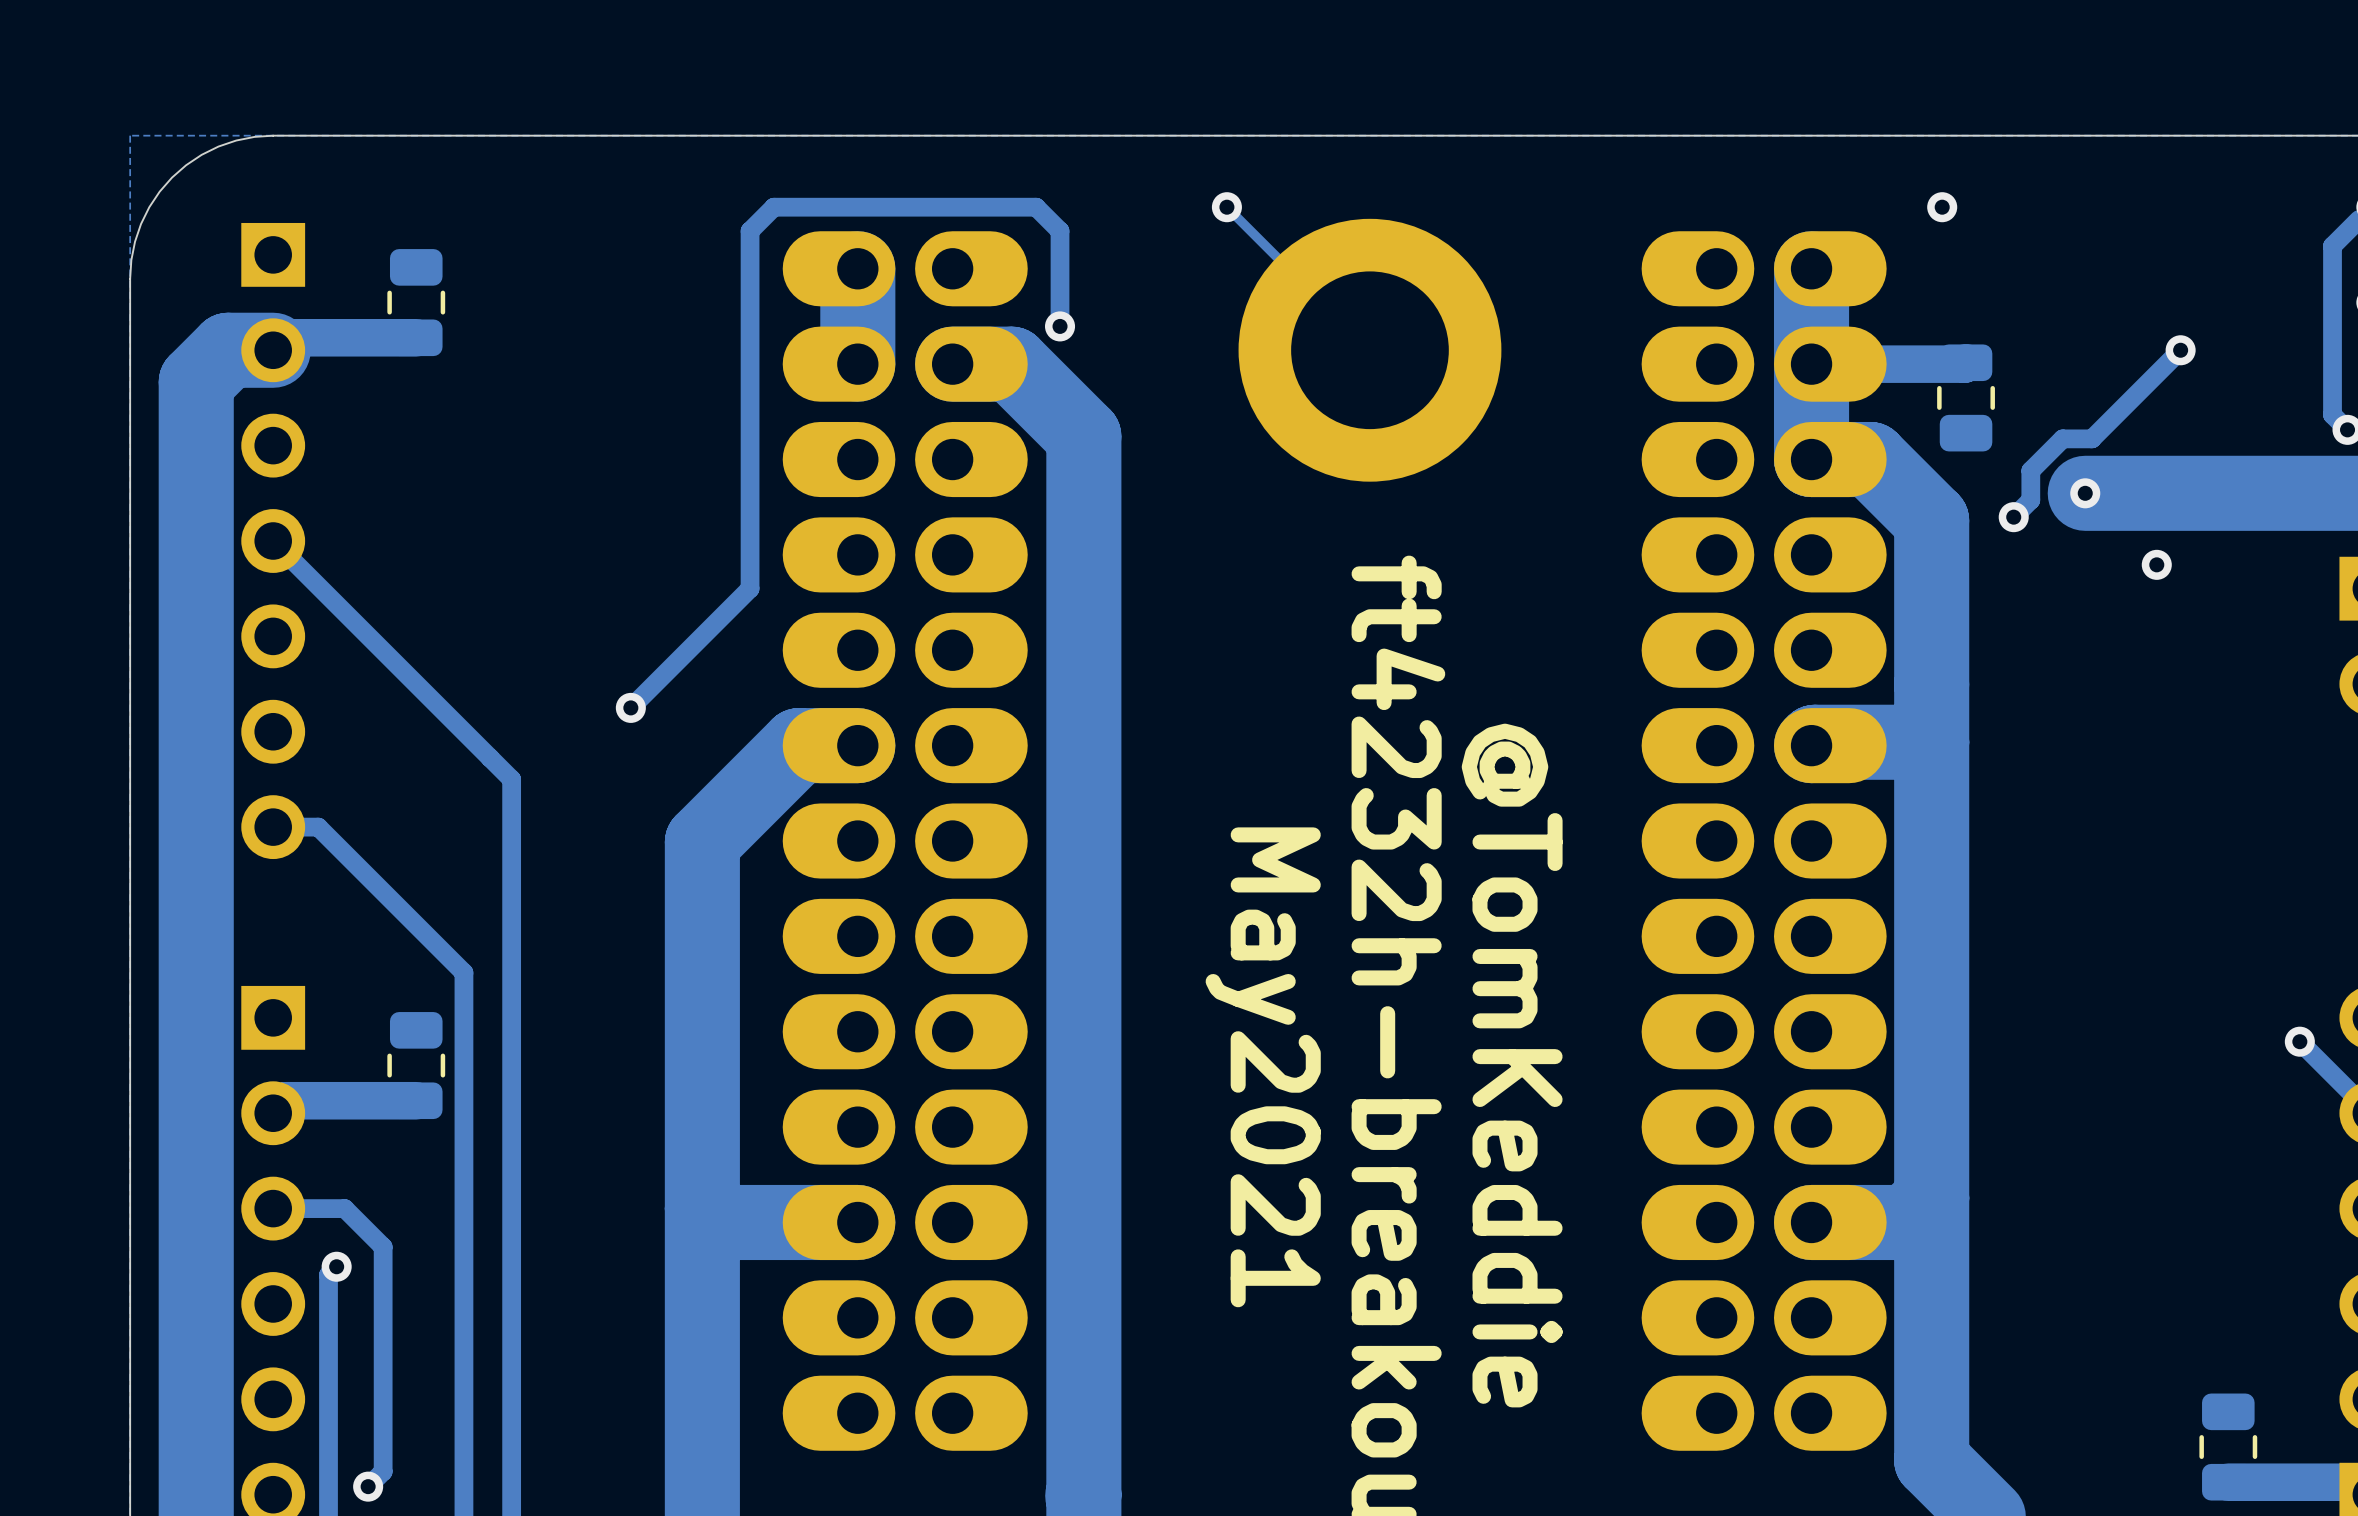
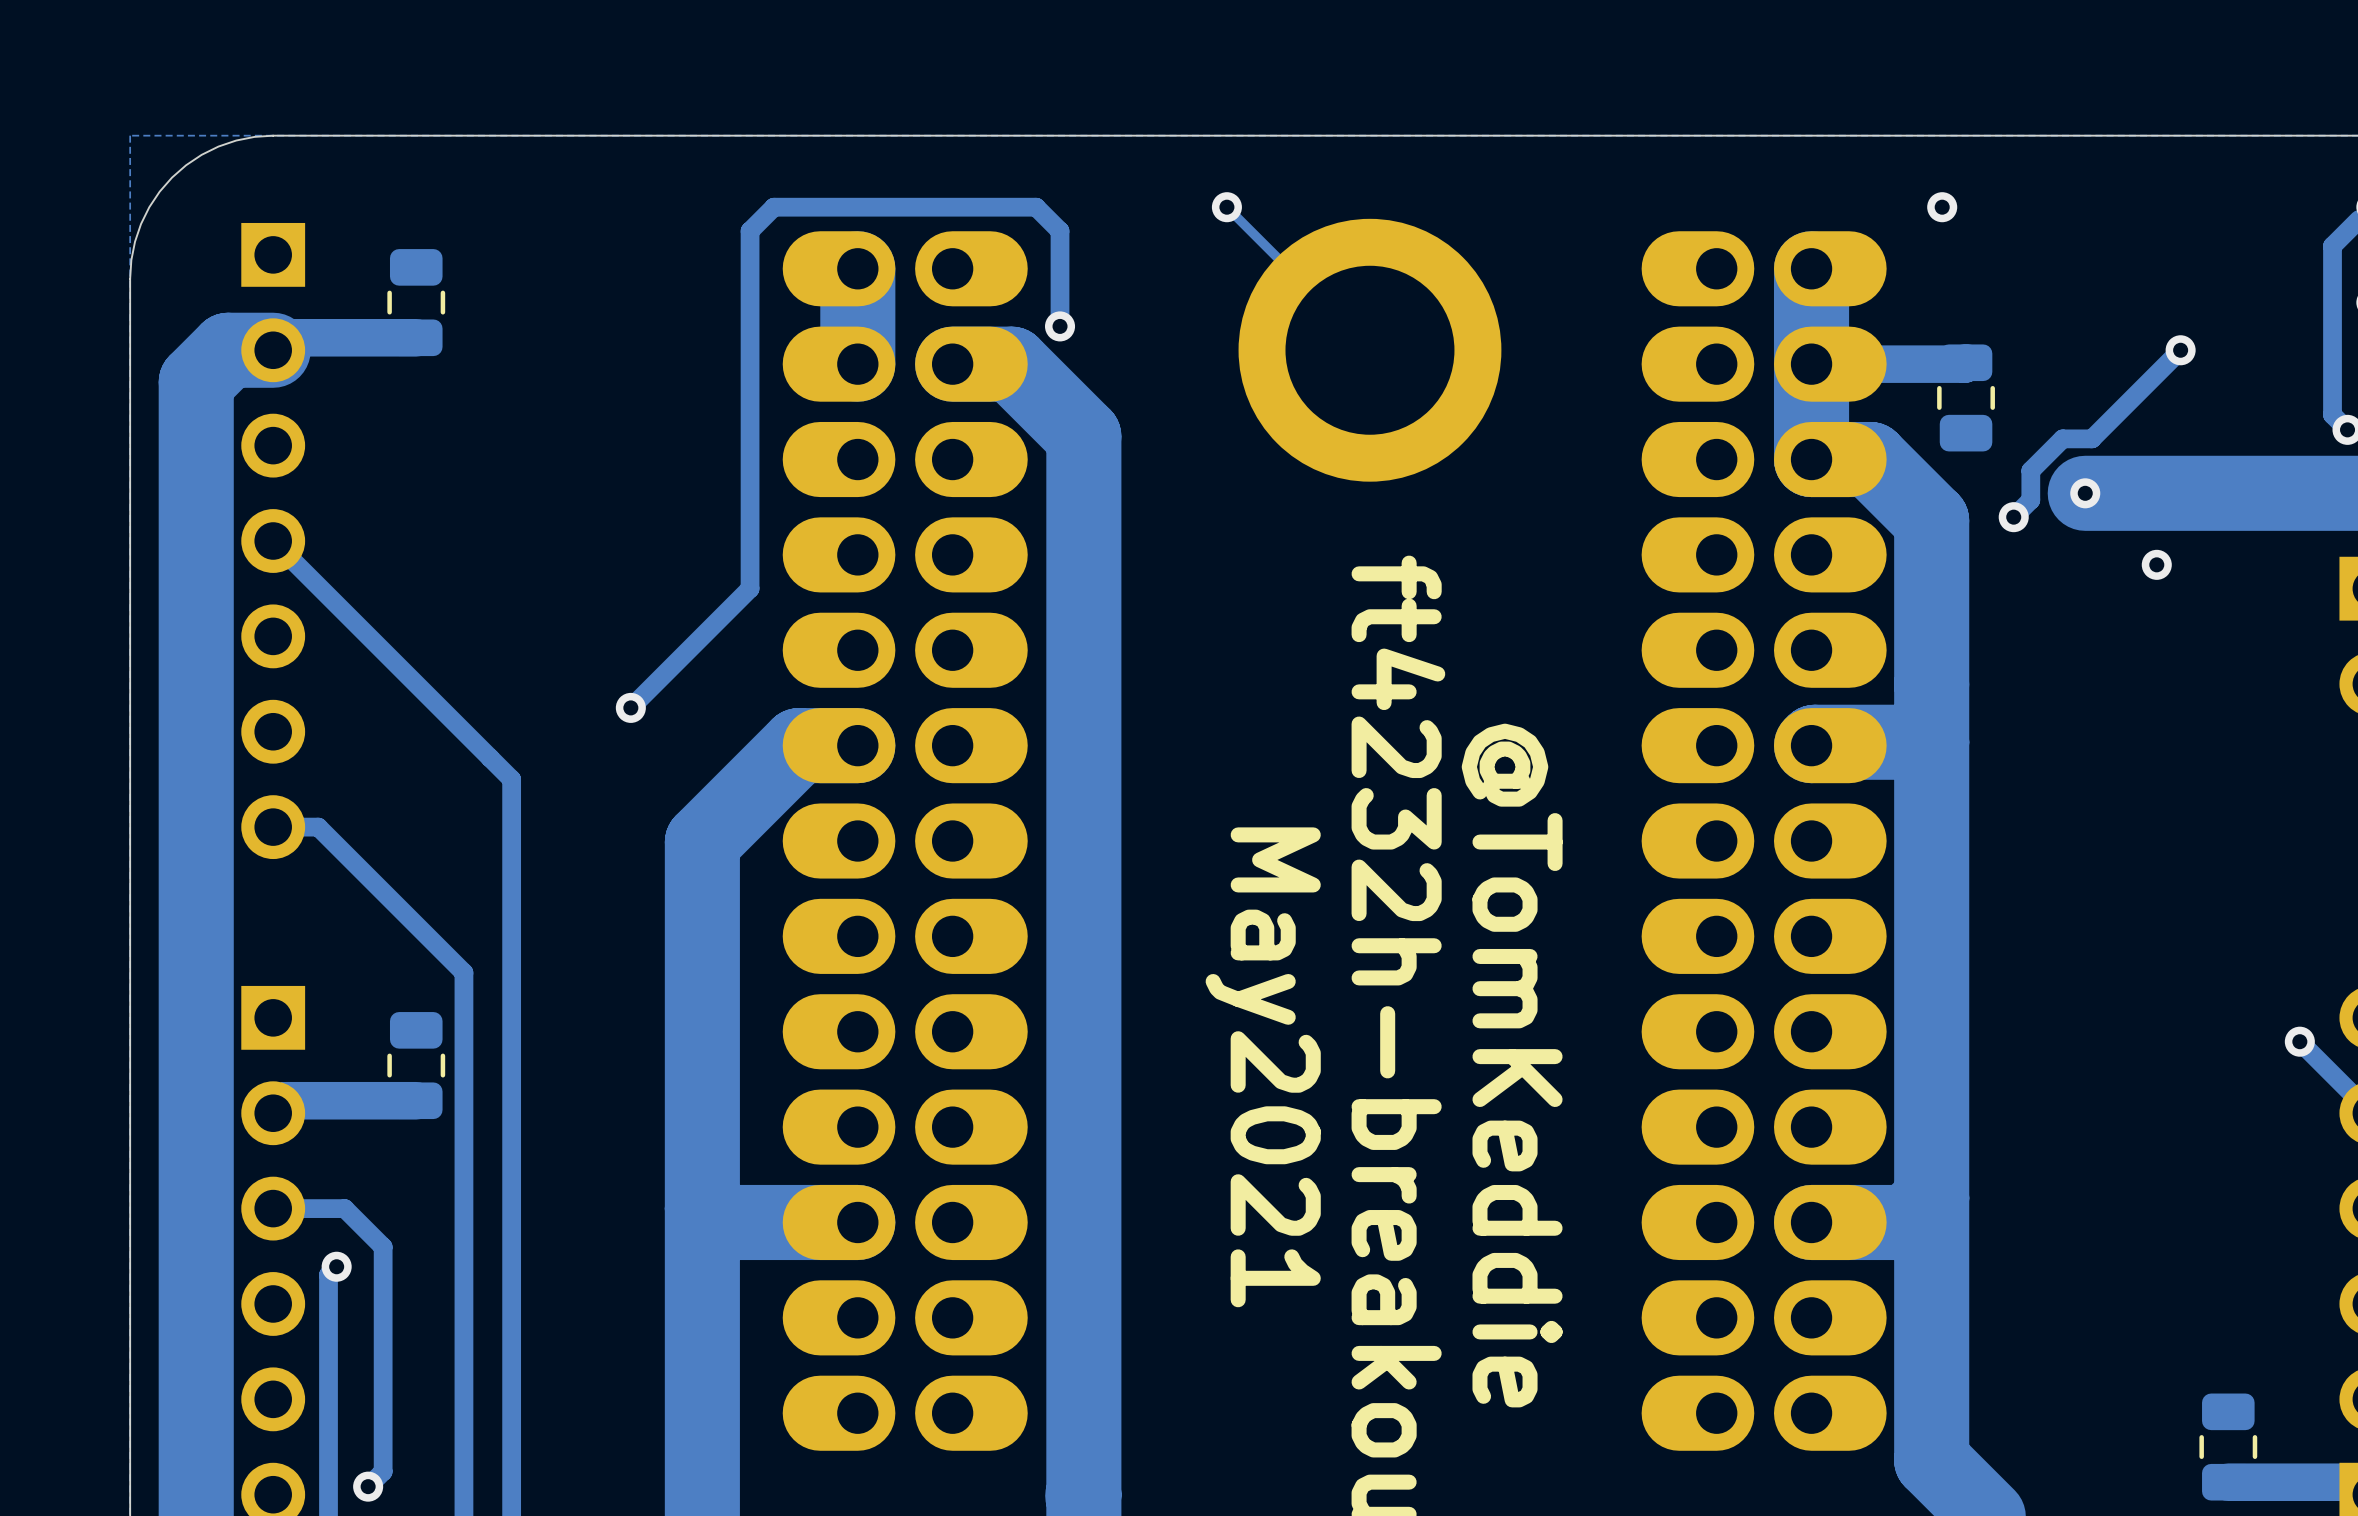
part footprint: [1238, 218, 1502, 482] -> [1238, 218, 1502, 482]

